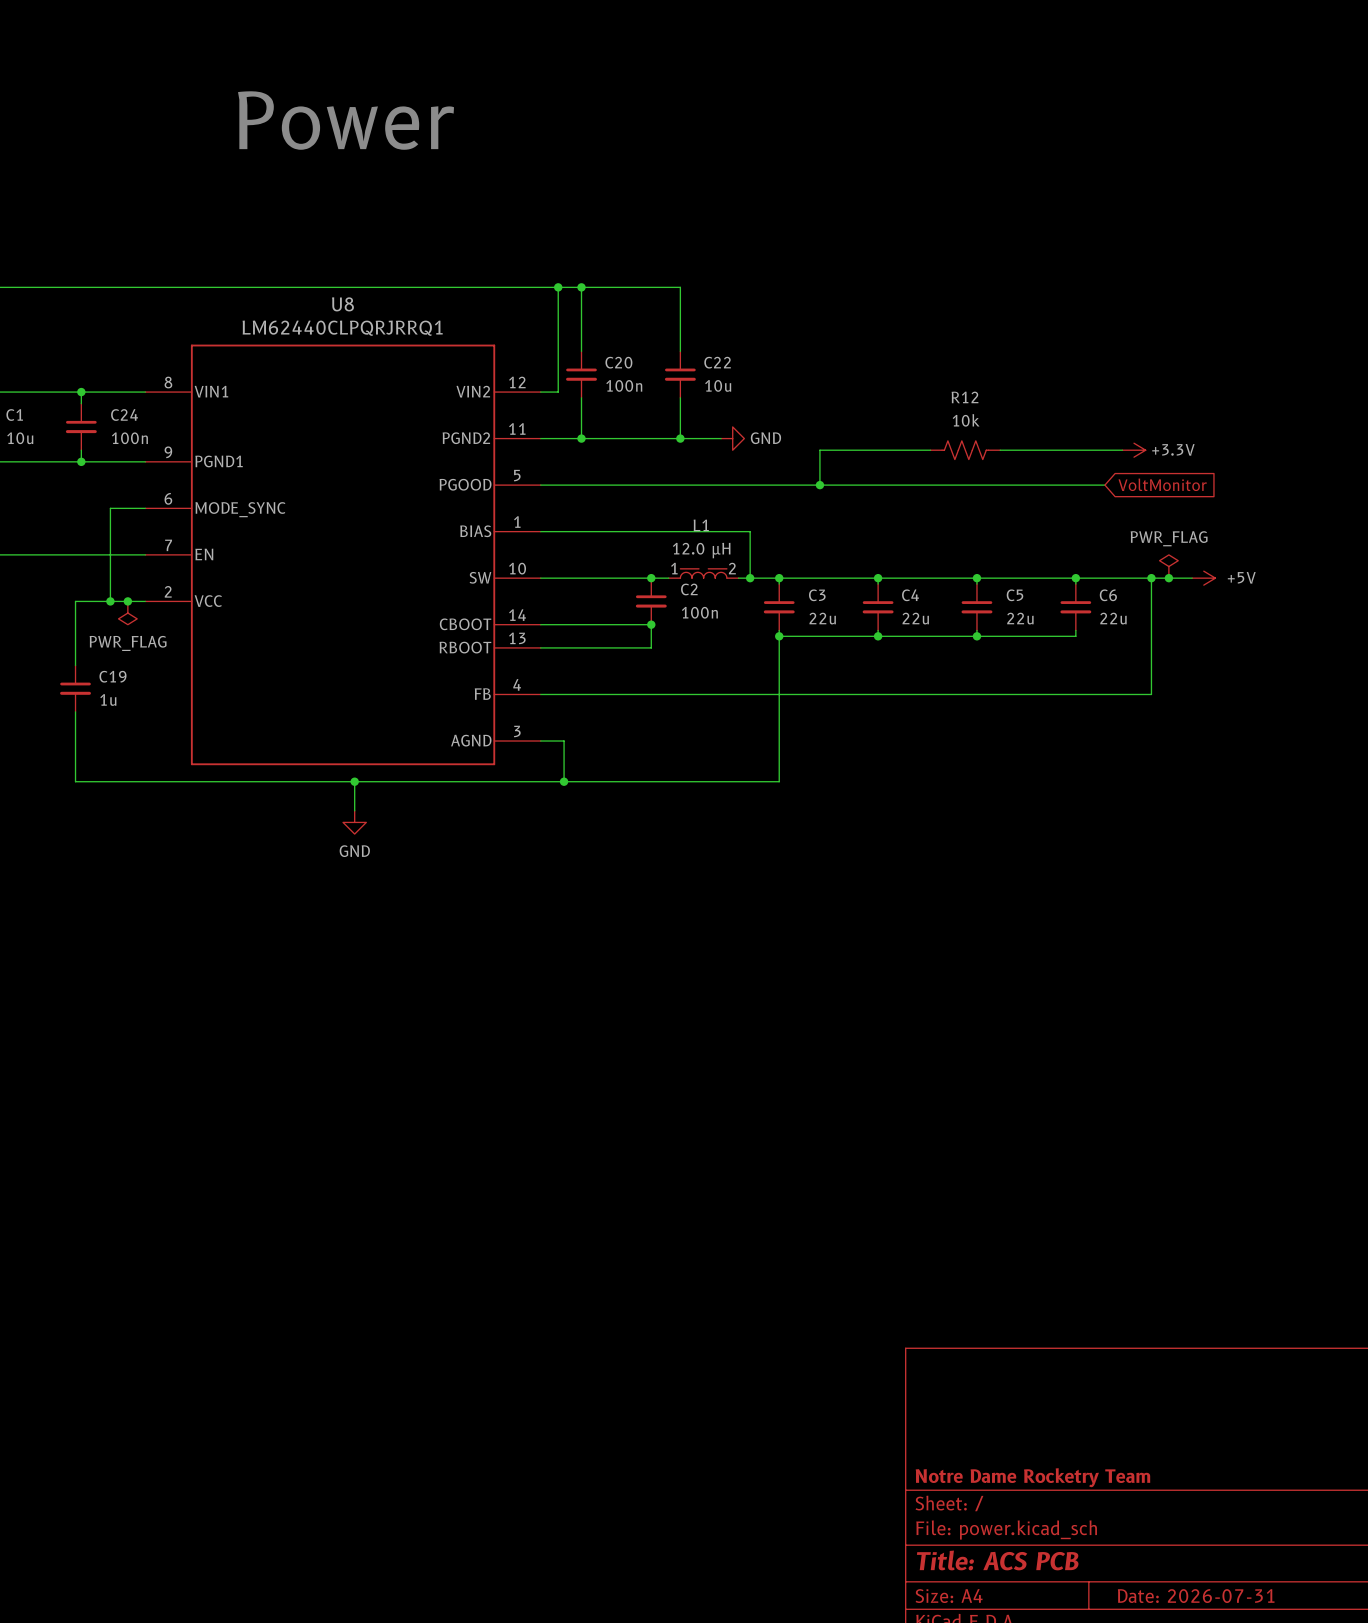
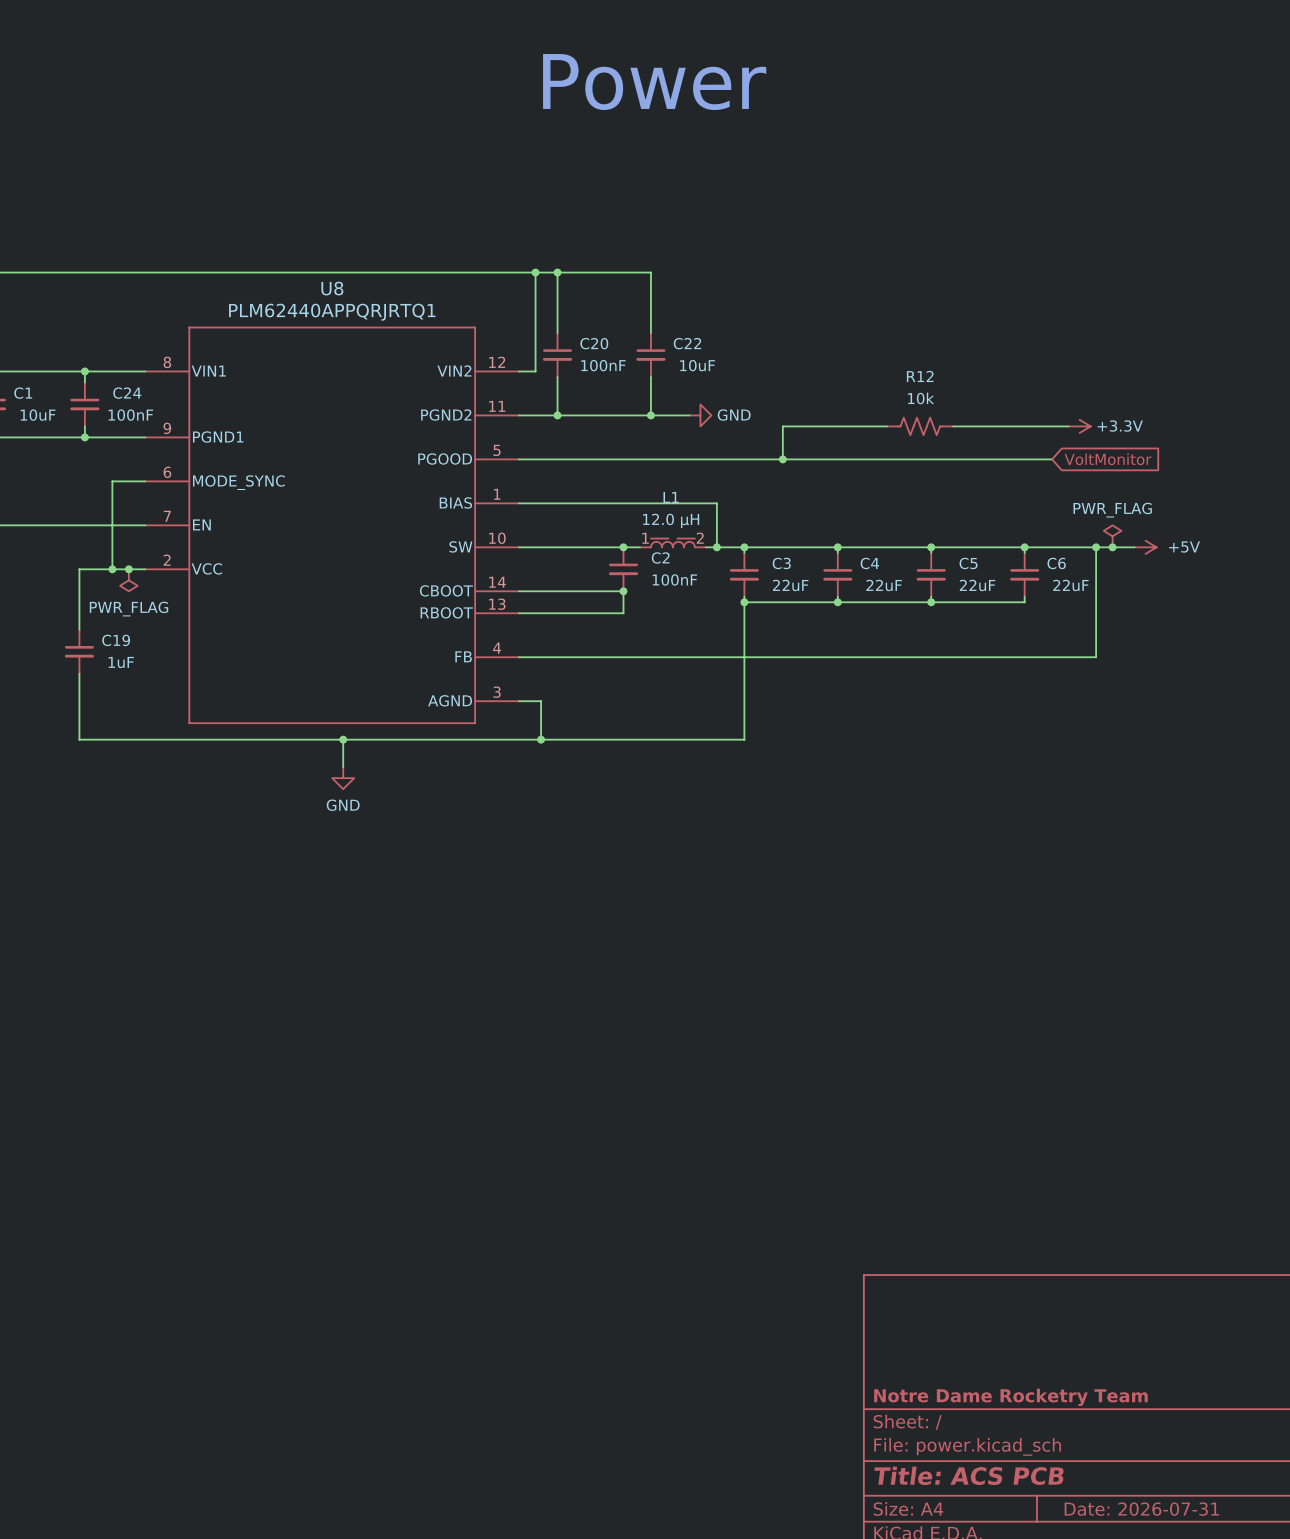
text: none -> Power (654, 82)
text: Power (346, 120) -> none
U8 value: LM62440CLPQRJRRQ1 (342, 328) -> PLM62440APPQRJRTQ1 (332, 312)
C20 value: 100n (624, 385) -> 100nF (603, 365)
C22 value: 10u (718, 385) -> 10uF (697, 365)
C1 value: 10u (20, 438) -> 10uF (38, 415)
C24 value: 100n (129, 438) -> 100nF (130, 415)
C2 value: 100n (699, 612) -> 100nF (674, 579)
C3 value: 22u (822, 618) -> 22uF (790, 585)
C4 value: 22u (915, 618) -> 22uF (884, 585)
C5 value: 22u (1020, 618) -> 22uF (977, 585)
C6 value: 22u (1113, 618) -> 22uF (1070, 585)
C19 value: 1u (108, 699) -> 1uF (121, 662)

